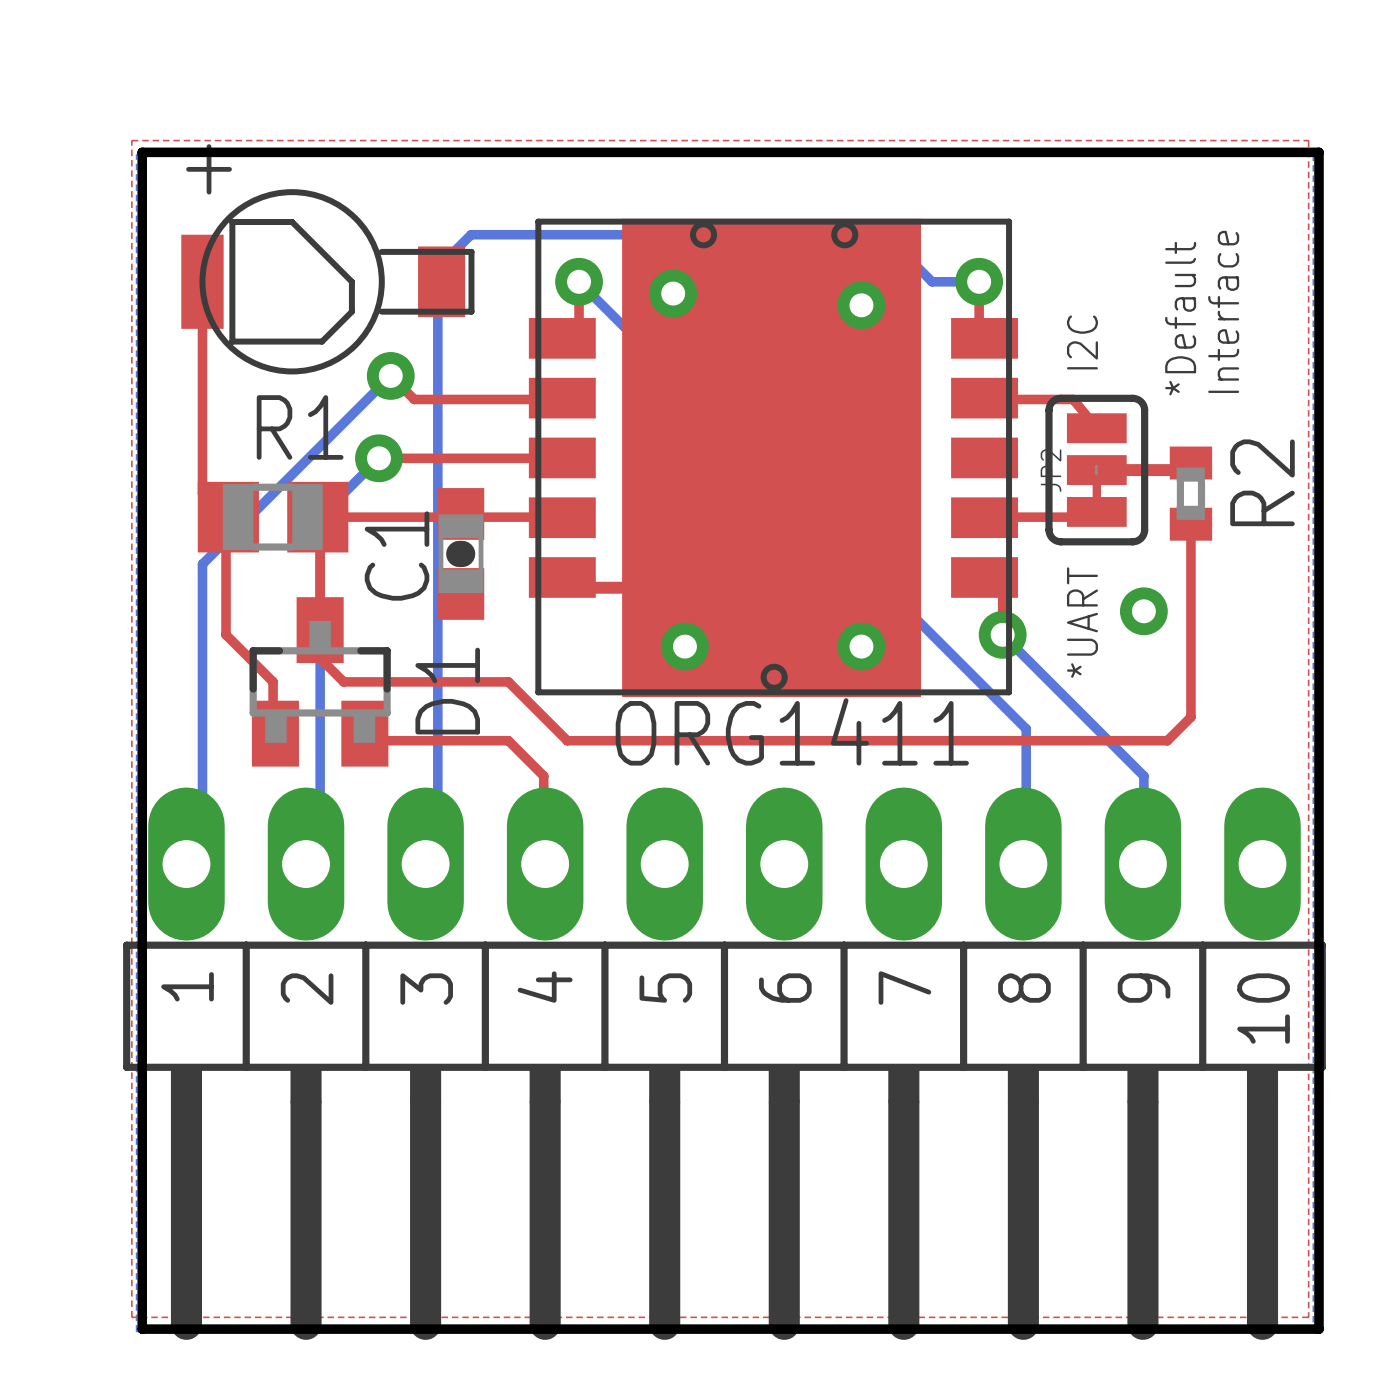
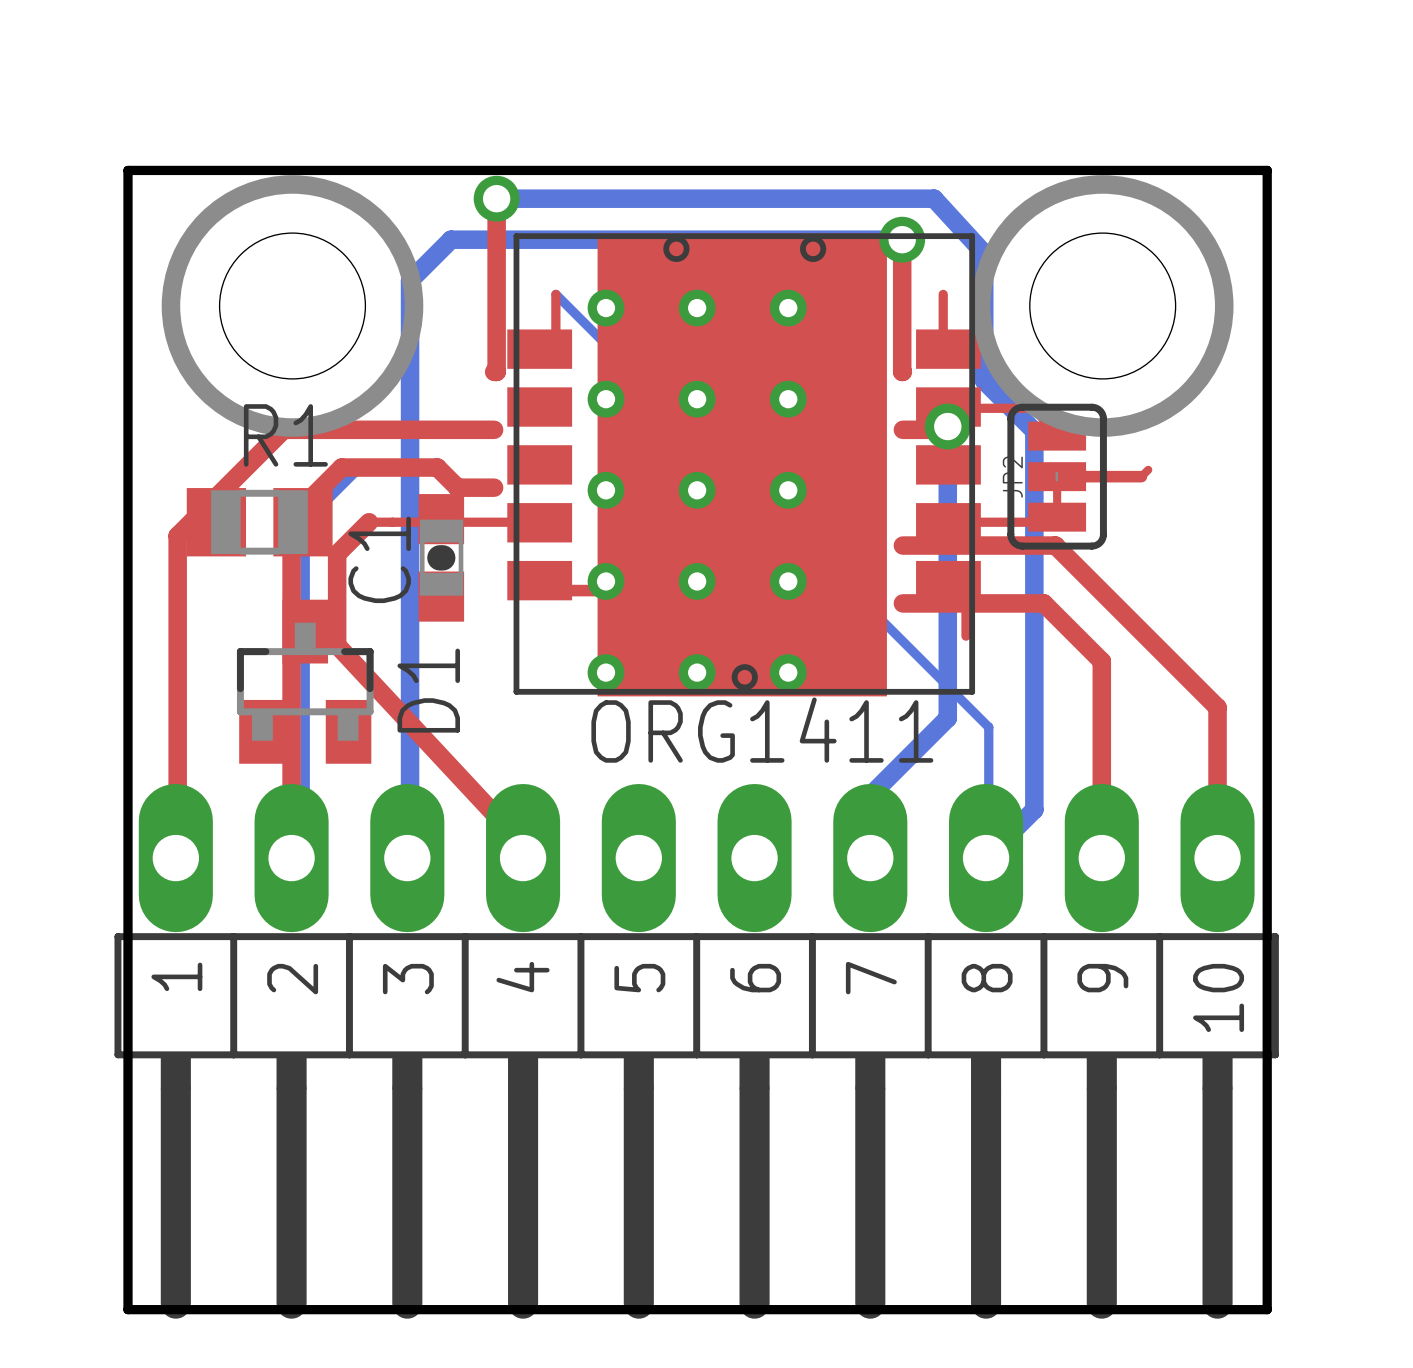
top zone outline: (131, 140) (131, 1317) (1308, 1317) (1308, 140) (131, 140) -> none
drawing: [137, 147, 1324, 1334] -> none
top track: none -> (496, 198) (496, 371) (494, 371)
bottom track: none -> (496, 198) (934, 198) (984, 253) (984, 380) (1034, 431) (1034, 809) (986, 858) (984, 856)
via: none -> (496, 198)
top track: none -> (902, 239) (902, 371)
via: none -> (902, 239)
top track: (202, 281) (202, 493) (226, 493) -> none
part: (327, 281) -> none
via: (579, 281) -> none
bottom track: (979, 281) (932, 281) (885, 234) (471, 234) (437, 268) (437, 846) (425, 864) -> (902, 239) (451, 239) (410, 280) (410, 855) (407, 858)
via: (979, 281) -> none
via position: (673, 293) -> (606, 308)
via: none -> (697, 308)
via position: (861, 305) -> (788, 308)
text: Interface (1223, 311) -> none
text: *Default (1180, 318) -> none
text: I2C (1082, 342) -> none
top track: (390, 375) (414, 399) (562, 398) -> none
bottom track: (390, 375) (202, 564) (202, 846) (186, 864) -> none
via: (390, 375) -> none
via: none -> (606, 399)
via: none -> (697, 399)
via: none -> (788, 399)
top track: none -> (947, 426) (944, 429) (902, 429)
bottom track: none -> (947, 426) (947, 718) (870, 795) (870, 858)
via: none -> (947, 426)
top track: none -> (494, 429) (283, 429) (177, 535) (177, 856) (175, 858)
top track: (562, 457) (378, 458) -> none
via: (378, 458) -> none
top track: none -> (494, 487) (457, 487) (437, 467) (341, 467) (291, 517) (291, 858)
via: none -> (606, 490)
via: none -> (697, 490)
via: none -> (788, 490)
top track: (226, 493) (226, 634) (273, 681) (273, 728) (275, 733) -> none
R2: (1190, 493) -> none
top track: (317, 517) (386, 517) -> none
top track: (320, 517) (320, 658) (343, 681) (508, 681) (567, 740) (1167, 740) (1190, 717) (1190, 517) -> none
top track: none -> (902, 545) (1055, 545) (1217, 707) (1217, 858)
via: none -> (606, 581)
via: none -> (697, 581)
via: none -> (788, 581)
top track: none -> (902, 603) (1043, 603) (1101, 661) (1101, 858)
via: (1143, 611) -> none
text: *UART (1082, 622) -> none
bottom track: (1002, 634) (1143, 776) (1142, 864) -> none
via: (1002, 634) -> none
via: (684, 646) -> none
via: (861, 646) -> none
via: none -> (606, 672)
via: none -> (697, 672)
via: none -> (788, 672)
top track: (364, 733) (367, 740) (508, 740) (543, 776) (545, 864) -> (369, 522) (337, 554) (337, 645) (523, 844) (523, 858)
part: none -> (697, 740)

